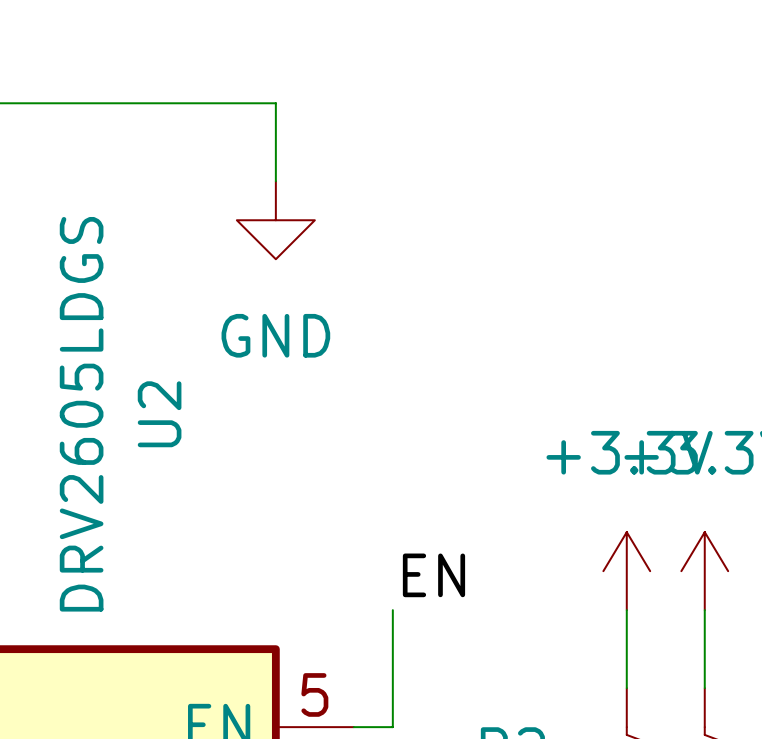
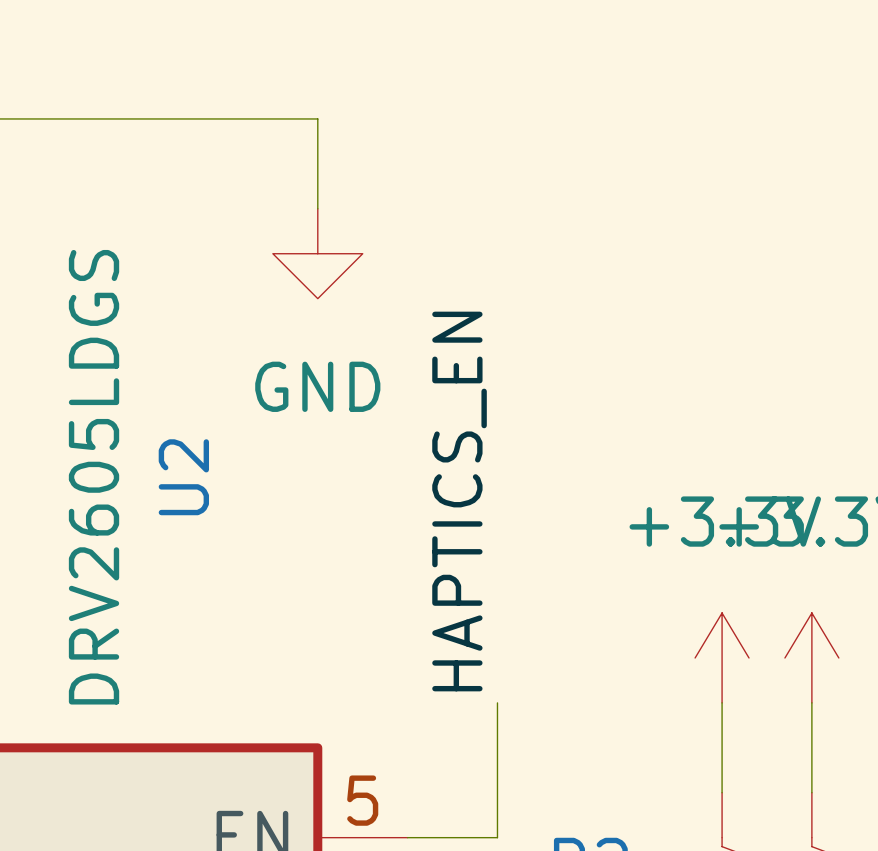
label: EN (433, 575) -> HAPTICS_EN (459, 501)
wire: (392, 610) (392, 727) -> (497, 702) (497, 837) (452, 837)

